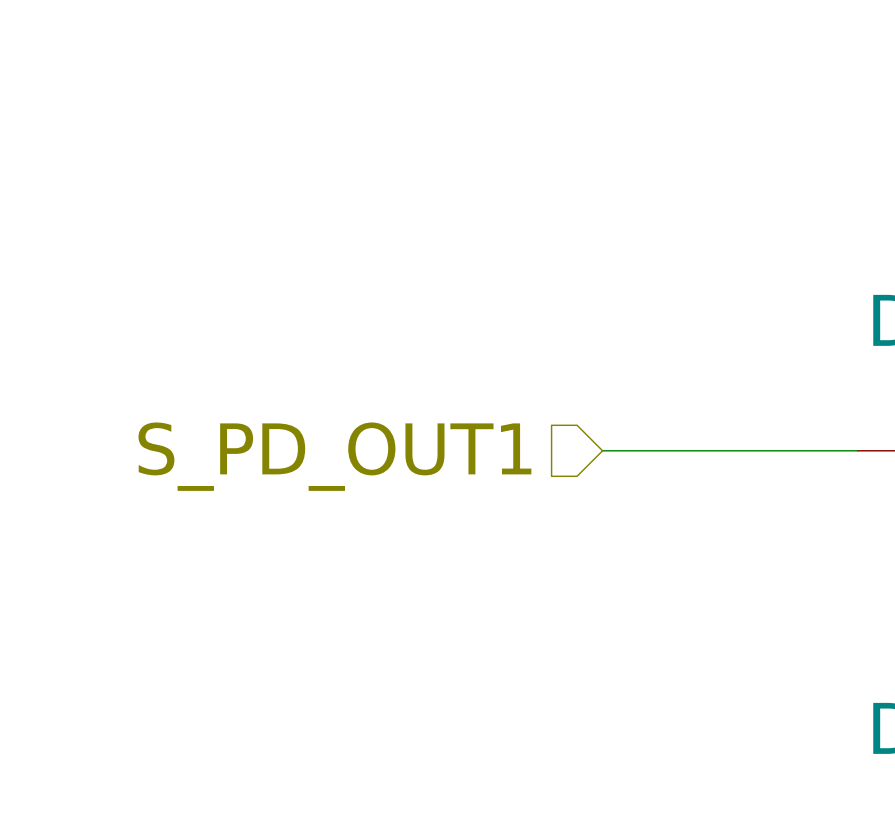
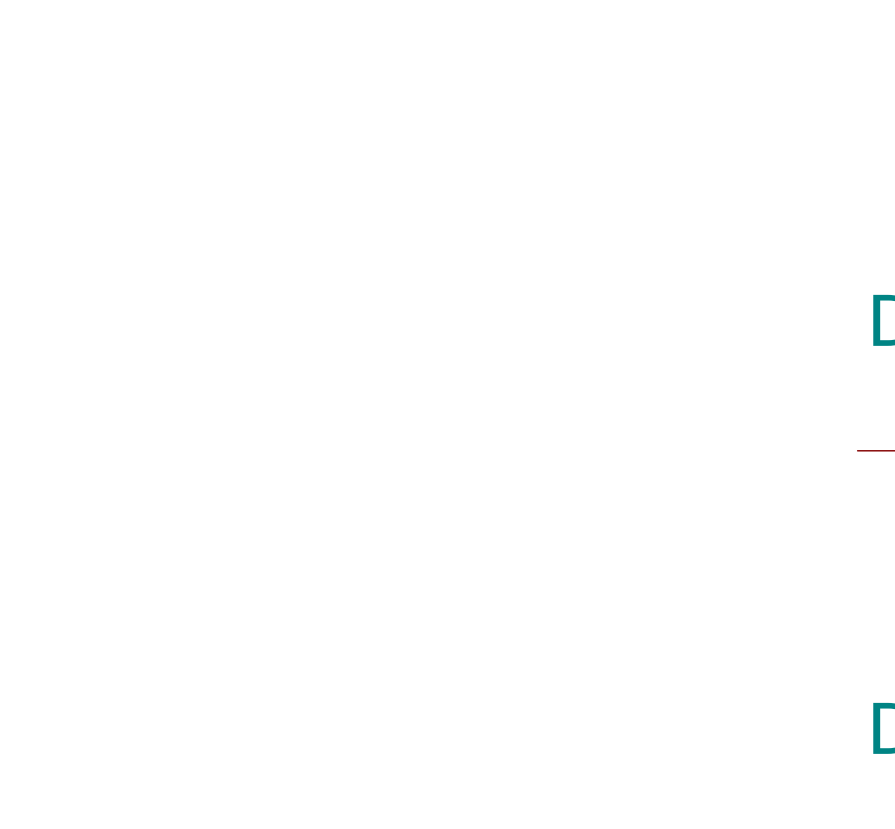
wire: (602, 450) (857, 450) -> none
hierarchical label: S_PD_OUT1 (334, 456) -> none

